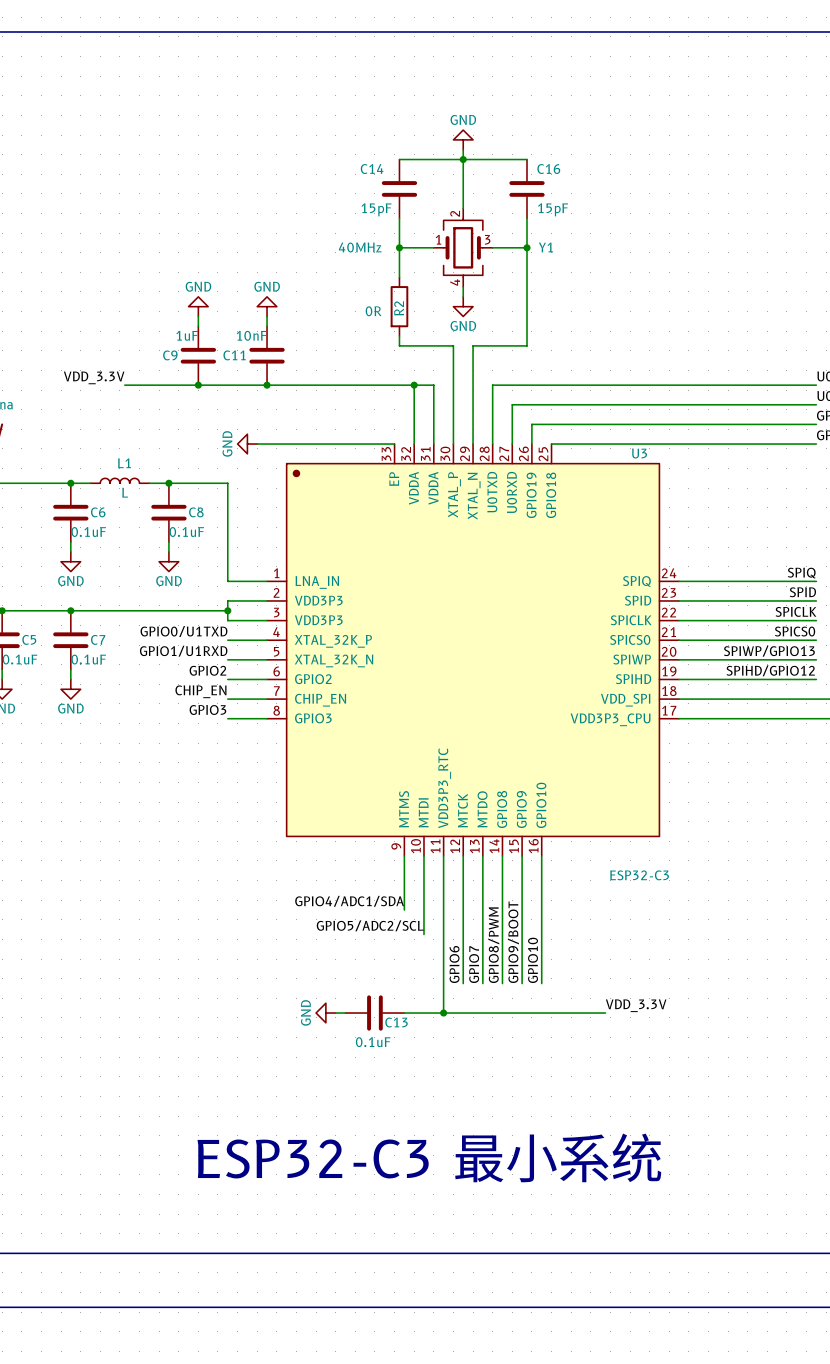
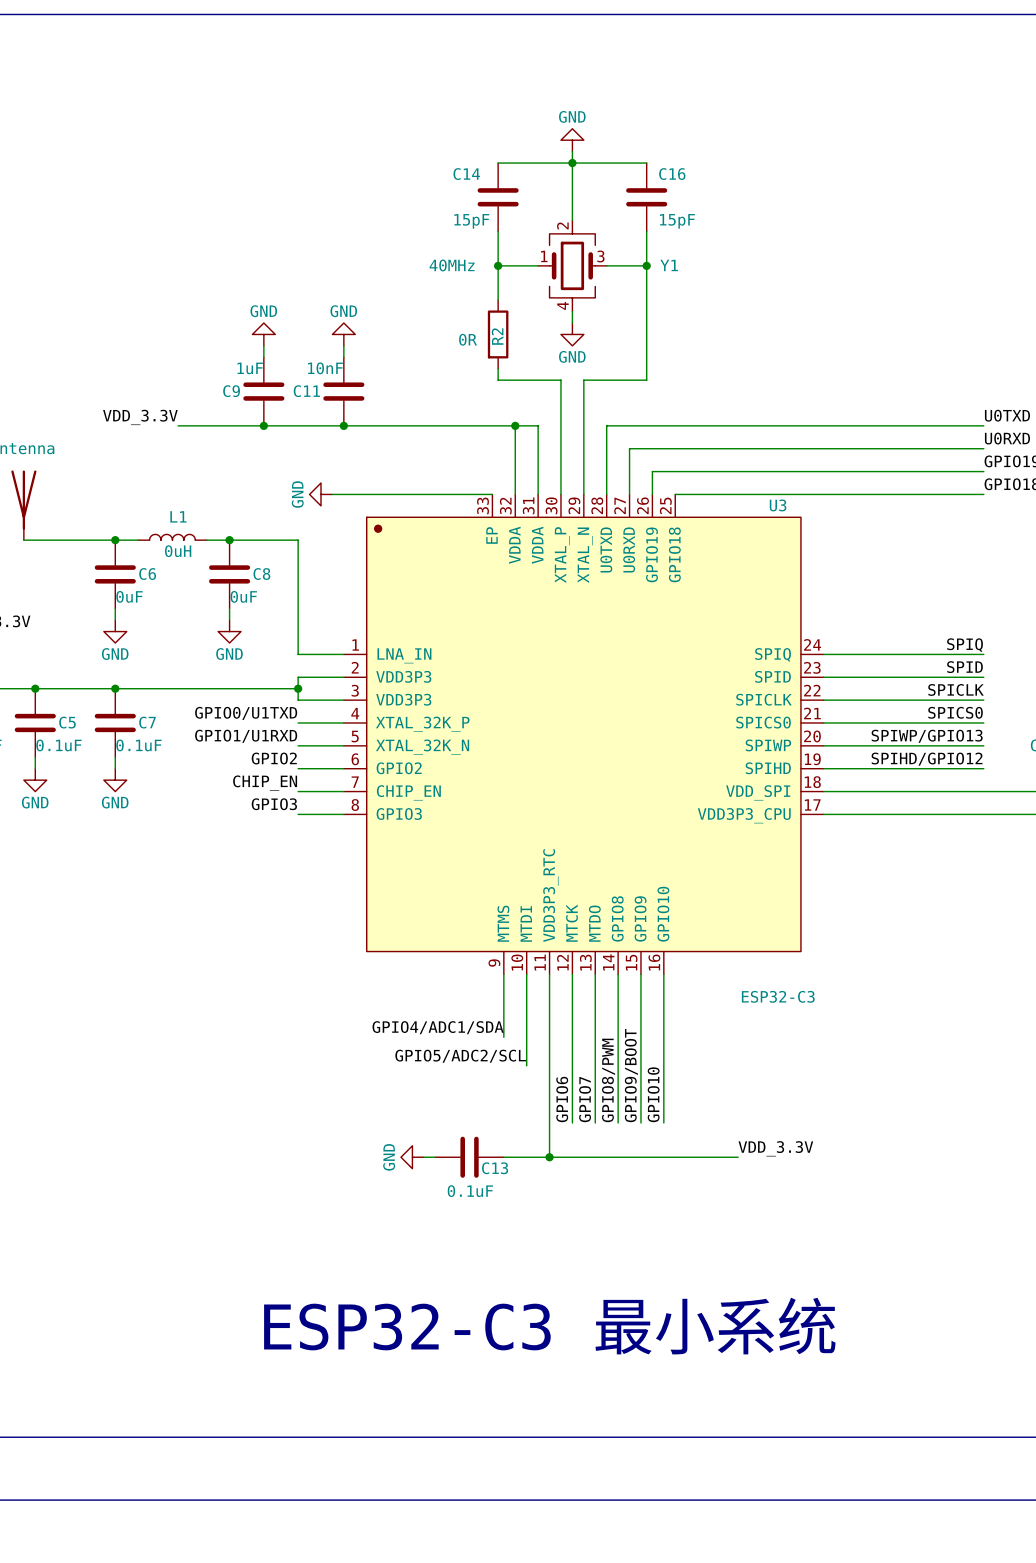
L1 value: L (125, 492) -> 0uH (178, 551)
C6 value: 0.1uF (88, 532) -> 0uF (129, 596)
C8 value: 0.1uF (186, 532) -> 0uF (243, 596)

